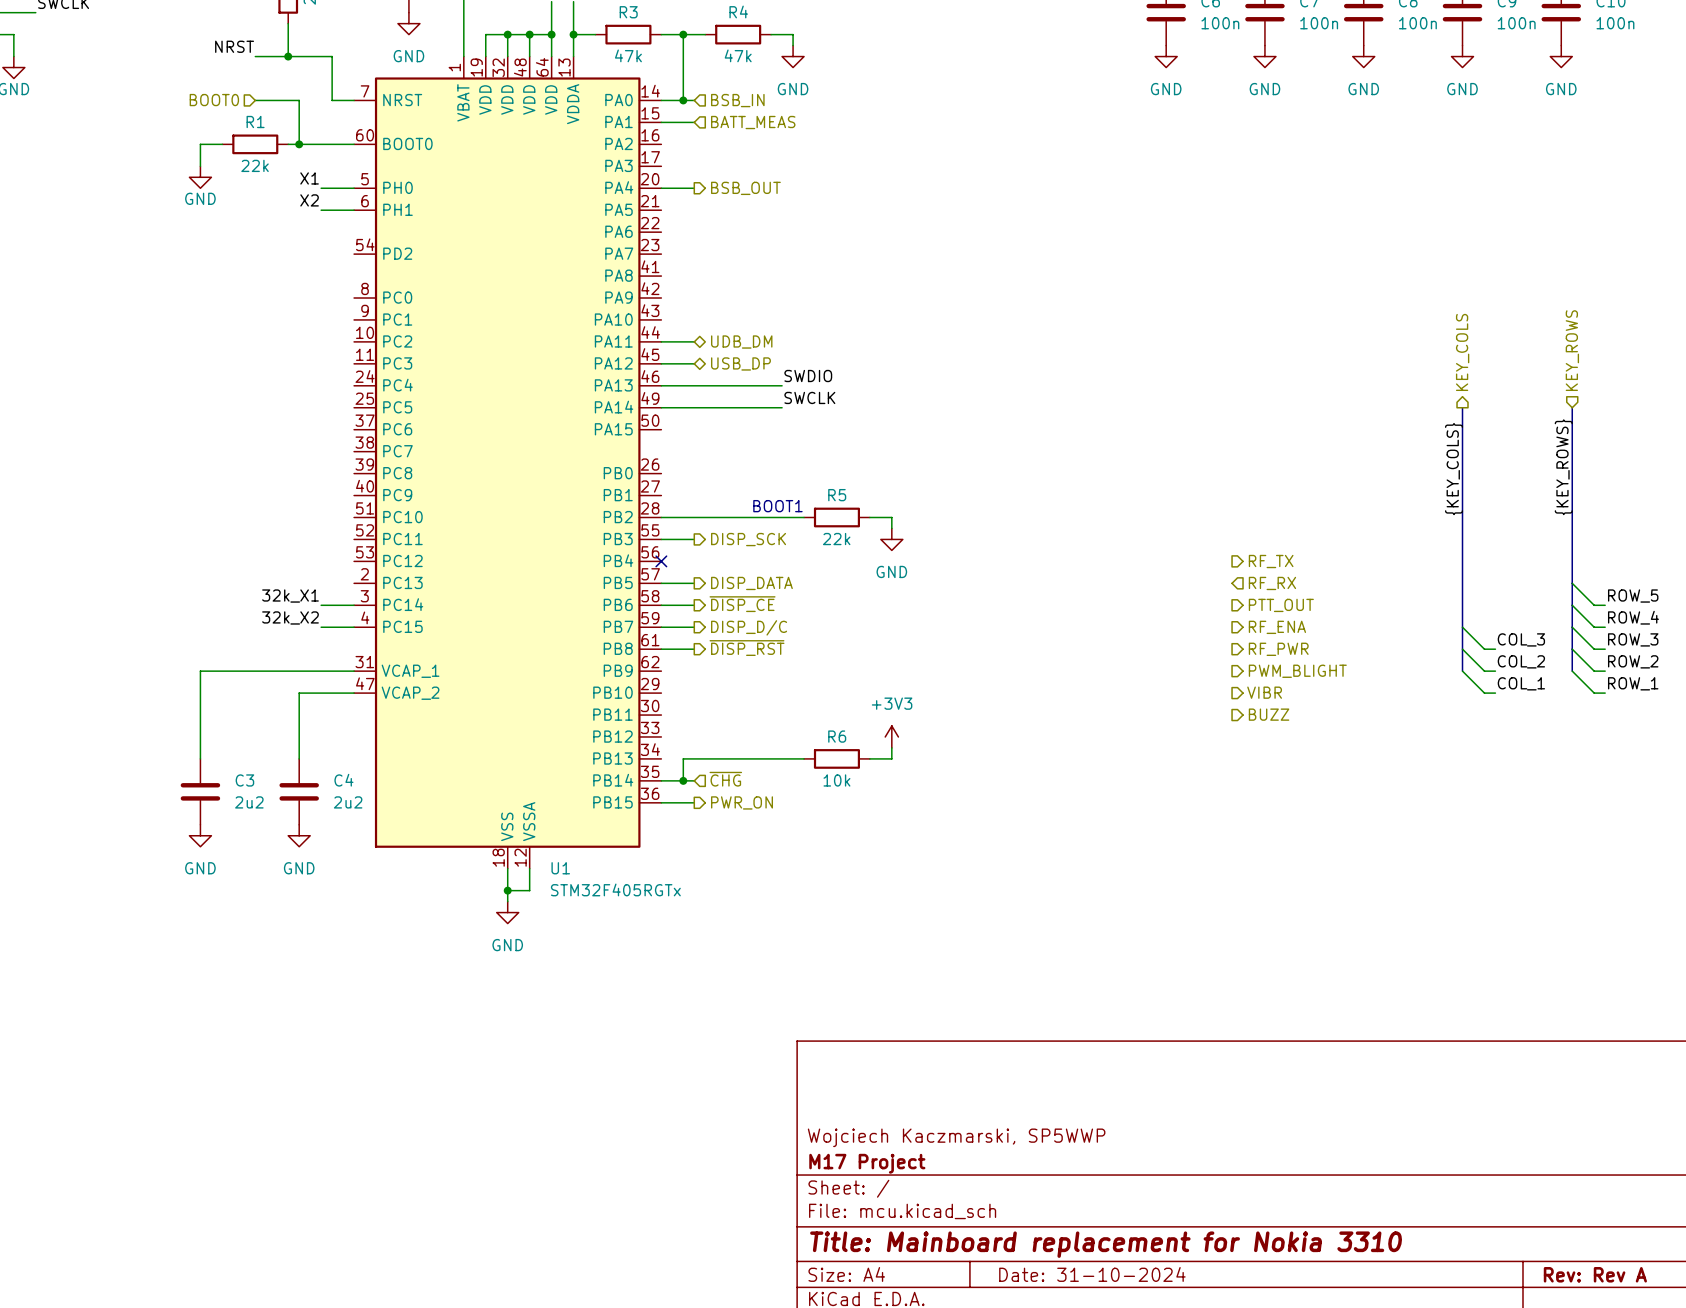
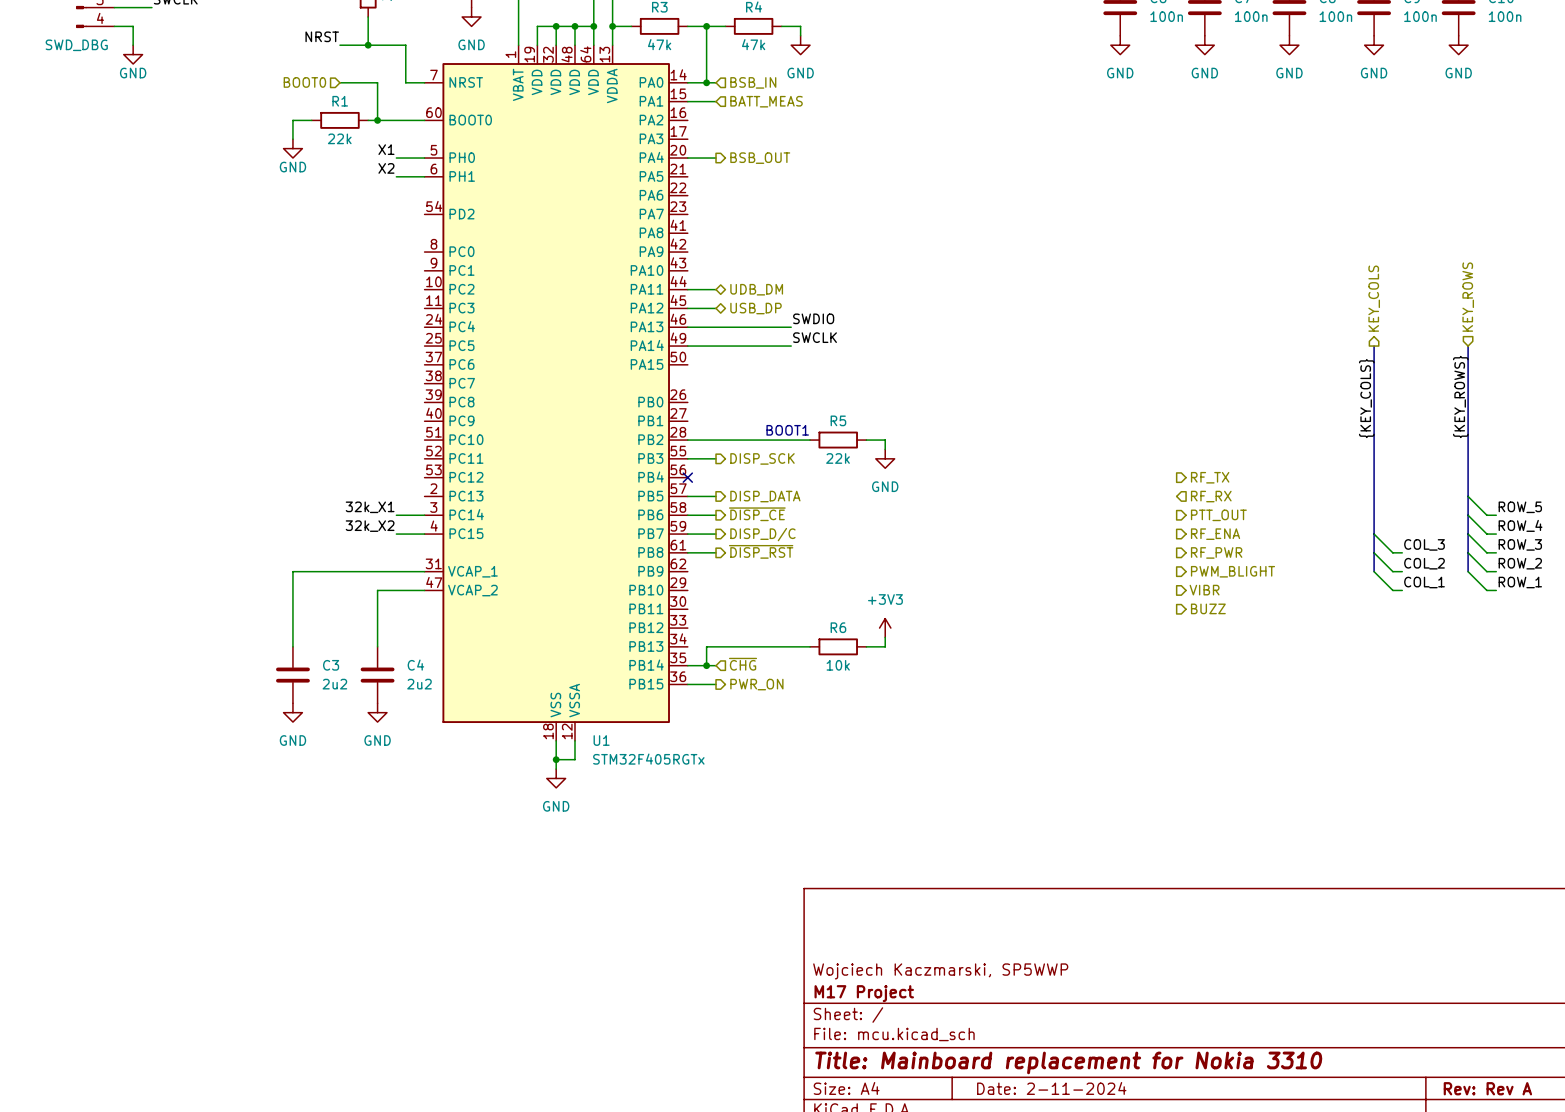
title block: Date: 31-10-2024 (1092, 1274) -> Date: 2-11-2024 (1051, 1088)

